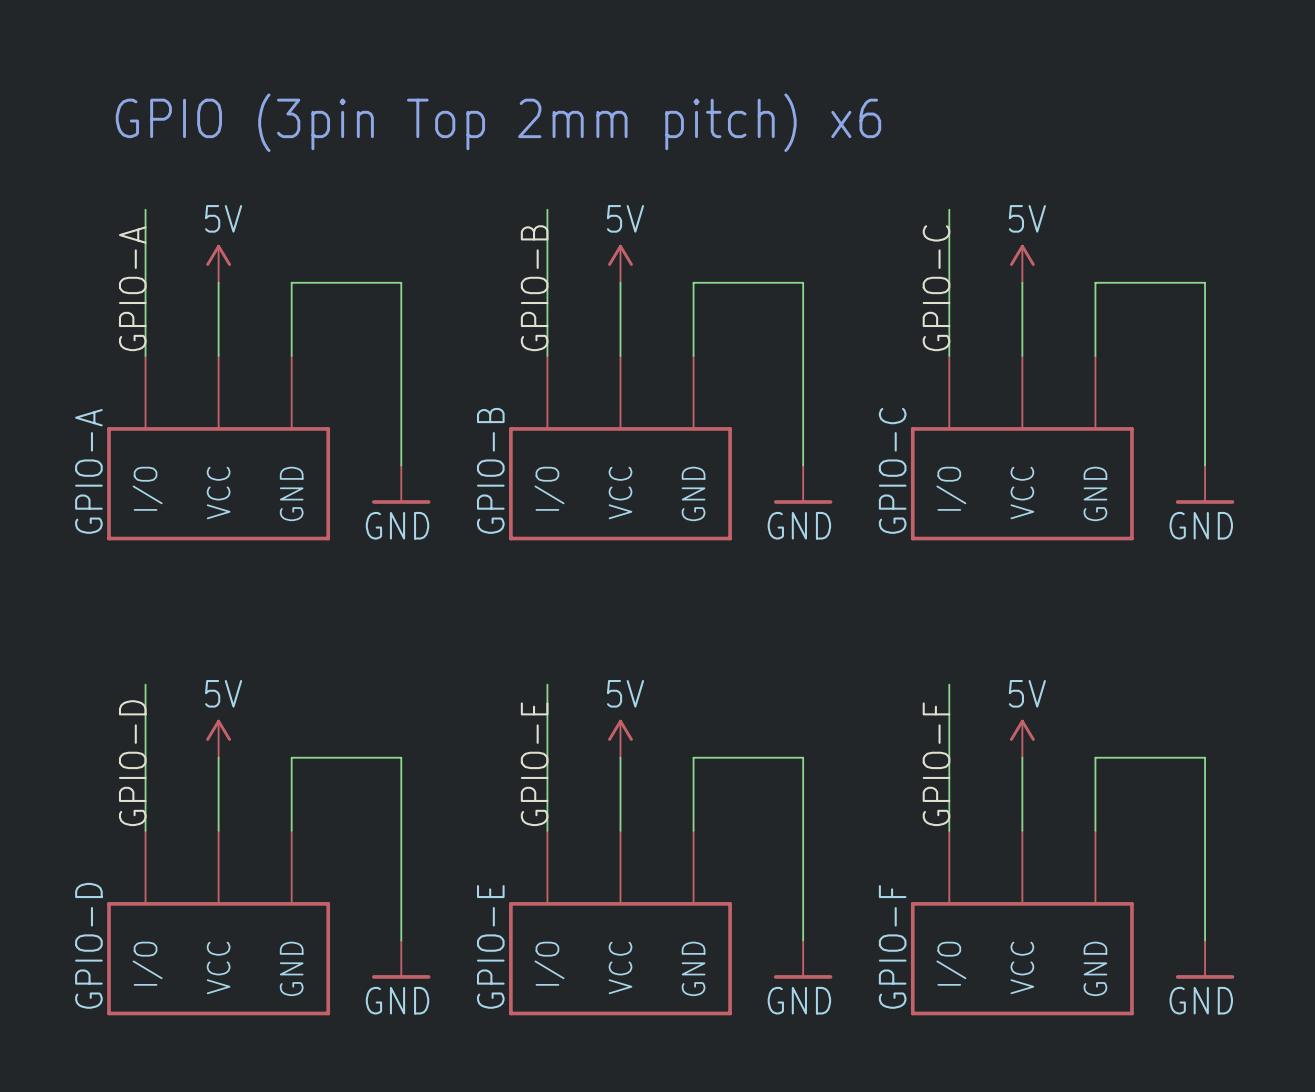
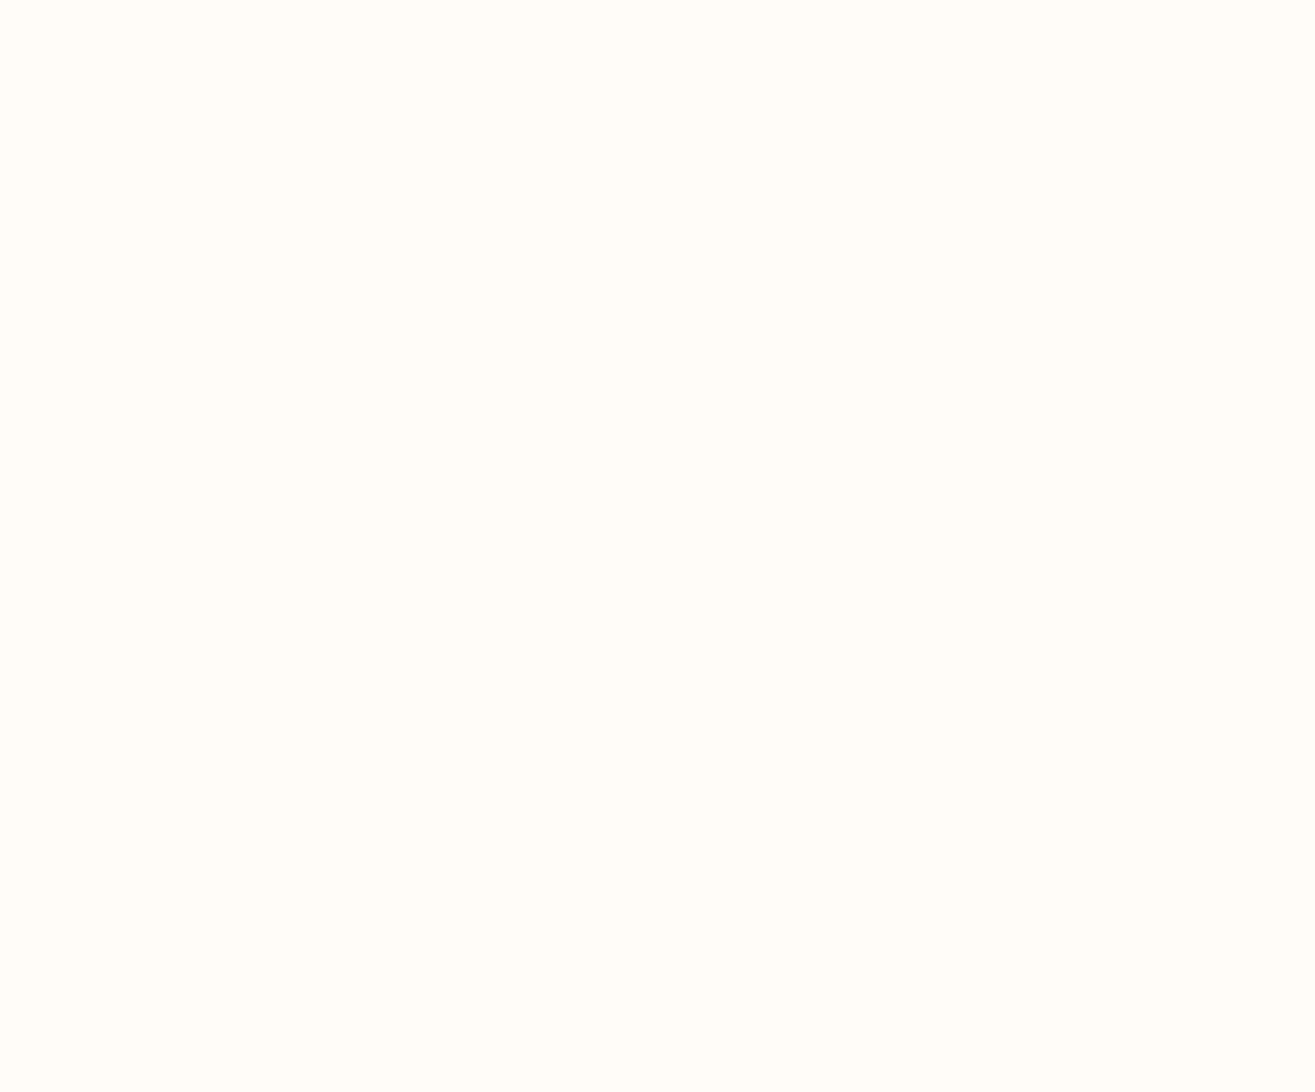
text: GPIO (3pin Top 2mm pitch) x6 (498, 122) -> none
wire: (145, 209) (145, 355) -> none
wire: (547, 209) (547, 355) -> none
wire: (949, 209) (949, 355) -> none
power symbol: 5V (218, 263) -> none
power symbol: 5V (620, 263) -> none
power symbol: 5V (1022, 263) -> none
wire: (218, 282) (218, 355) -> none
wire: (620, 282) (620, 355) -> none
wire: (1022, 282) (1022, 355) -> none
label: GPIO-A (132, 288) -> none
label: GPIO-B (534, 288) -> none
label: GPIO-C (936, 288) -> none
wire: (291, 355) (291, 282) (401, 282) (401, 465) -> none
wire: (693, 355) (693, 282) (803, 282) (803, 465) -> none
wire: (1095, 355) (1095, 282) (1205, 282) (1205, 465) -> none
GPIO-A: (218, 448) -> none
GPIO-B: (620, 448) -> none
GPIO-C: (1022, 448) -> none
power symbol: GND (401, 484) -> none
power symbol: GND (803, 484) -> none
power symbol: GND (1205, 484) -> none
wire: (145, 684) (145, 830) -> none
wire: (547, 684) (547, 830) -> none
wire: (949, 684) (949, 830) -> none
power symbol: 5V (218, 738) -> none
power symbol: 5V (620, 738) -> none
power symbol: 5V (1022, 738) -> none
wire: (218, 757) (218, 830) -> none
wire: (620, 757) (620, 830) -> none
wire: (1022, 757) (1022, 830) -> none
label: GPIO-D (132, 763) -> none
label: GPIO-E (534, 764) -> none
label: GPIO-F (936, 764) -> none
wire: (291, 830) (291, 757) (401, 757) (401, 940) -> none
wire: (693, 830) (693, 757) (803, 757) (803, 940) -> none
wire: (1095, 830) (1095, 757) (1205, 757) (1205, 940) -> none
GPIO-D: (218, 923) -> none
GPIO-E: (620, 923) -> none
GPIO-F: (1022, 923) -> none
power symbol: GND (401, 959) -> none
power symbol: GND (803, 959) -> none
power symbol: GND (1205, 959) -> none

